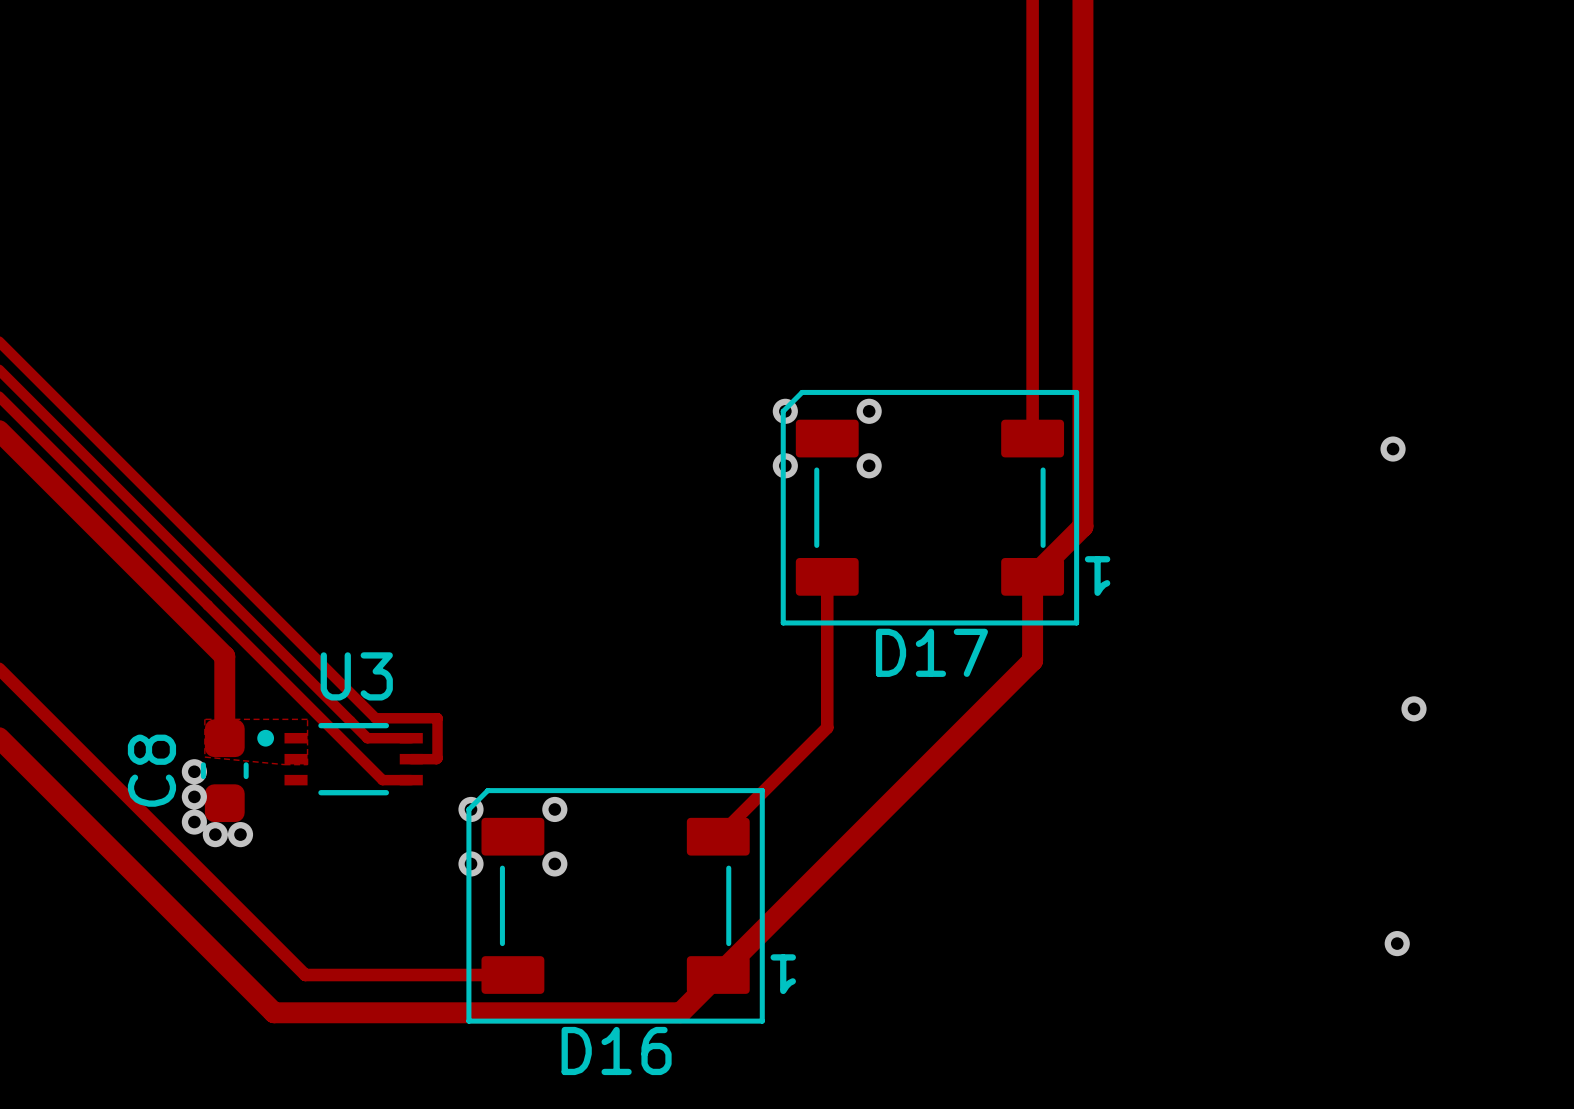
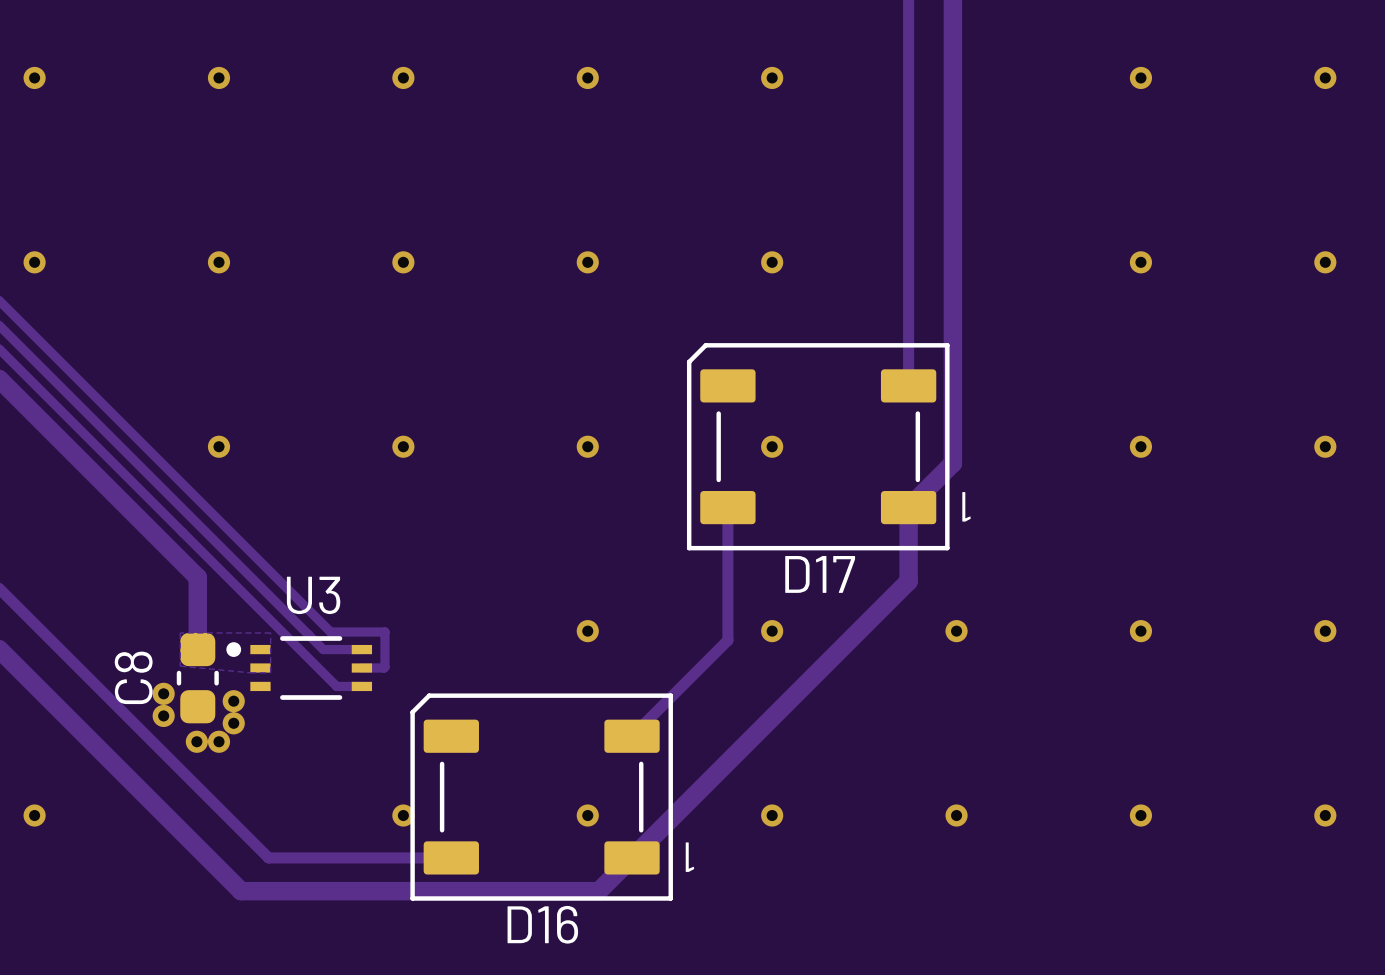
via: none -> (34, 77)
via: none -> (218, 77)
via: none -> (403, 77)
via: none -> (587, 77)
via: none -> (772, 77)
via: none -> (1140, 77)
via: none -> (1325, 77)
via: none -> (34, 262)
via: none -> (218, 262)
via: none -> (403, 262)
via: none -> (587, 262)
via: none -> (772, 262)
via: none -> (1140, 262)
via: none -> (1325, 262)
via: (785, 411) -> none
via: (869, 411) -> none
via: (1393, 449) -> none
via: (785, 465) -> none
via position: (869, 465) -> (772, 446)
via: none -> (218, 446)
via: none -> (403, 446)
via: none -> (587, 446)
via: none -> (1140, 446)
via: none -> (1325, 446)
via: (1414, 708) -> none
via: none -> (587, 631)
via: none -> (772, 631)
via: none -> (956, 631)
via: none -> (1140, 631)
via: none -> (1325, 631)
via: (194, 771) -> none
via: none -> (163, 693)
via: (194, 796) -> none
via: none -> (233, 701)
via: (471, 809) -> none
via: (554, 809) -> none
via: none -> (163, 715)
via: (194, 822) -> none
via: none -> (233, 723)
via: (215, 834) -> none
via: (240, 834) -> none
via: none -> (196, 741)
via: none -> (218, 741)
via: (471, 863) -> none
via: (554, 863) -> none
via: none -> (34, 815)
via: none -> (403, 815)
via: none -> (587, 815)
via: none -> (772, 815)
via: none -> (956, 815)
via: none -> (1140, 815)
via: none -> (1325, 815)
via: (1397, 943) -> none

